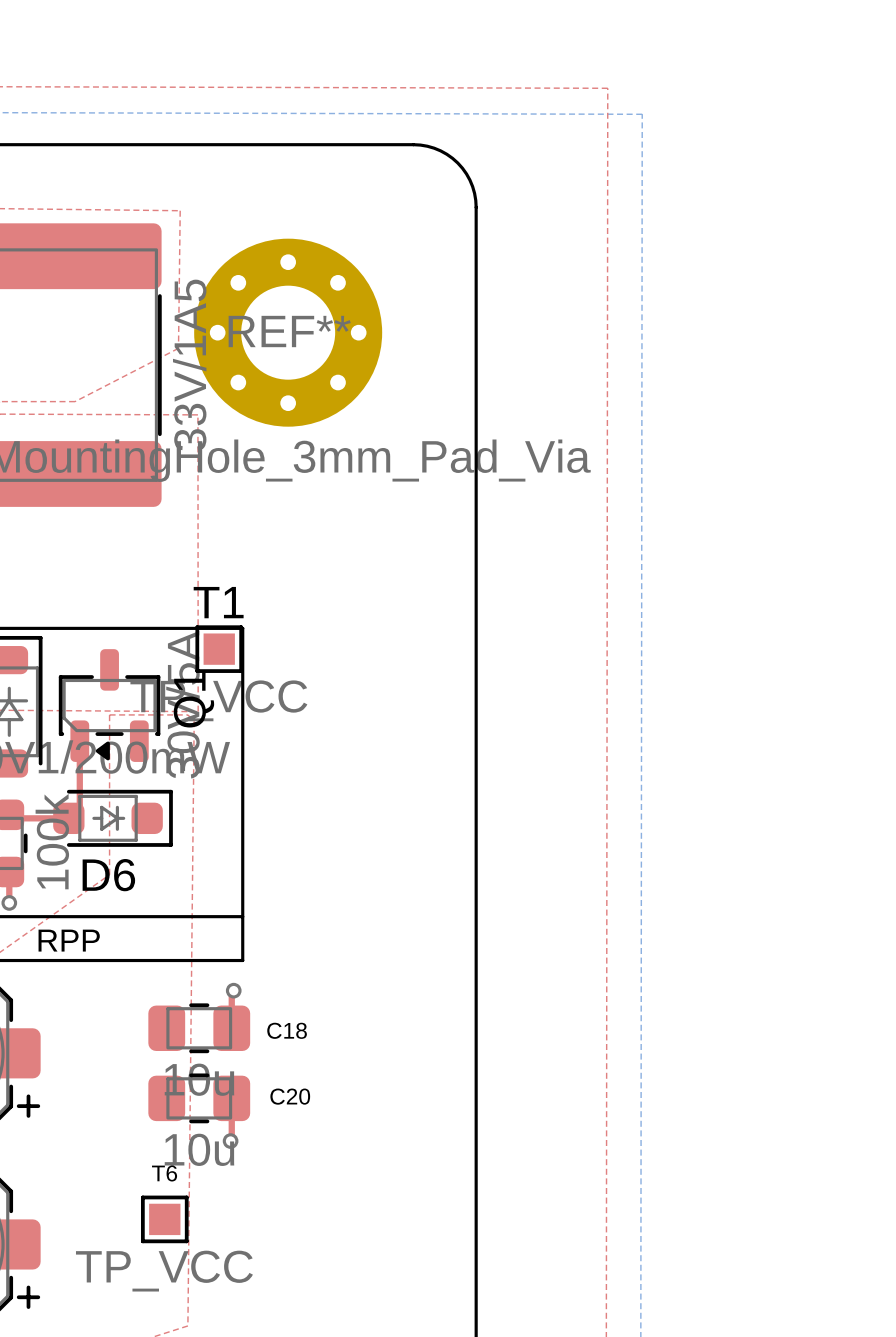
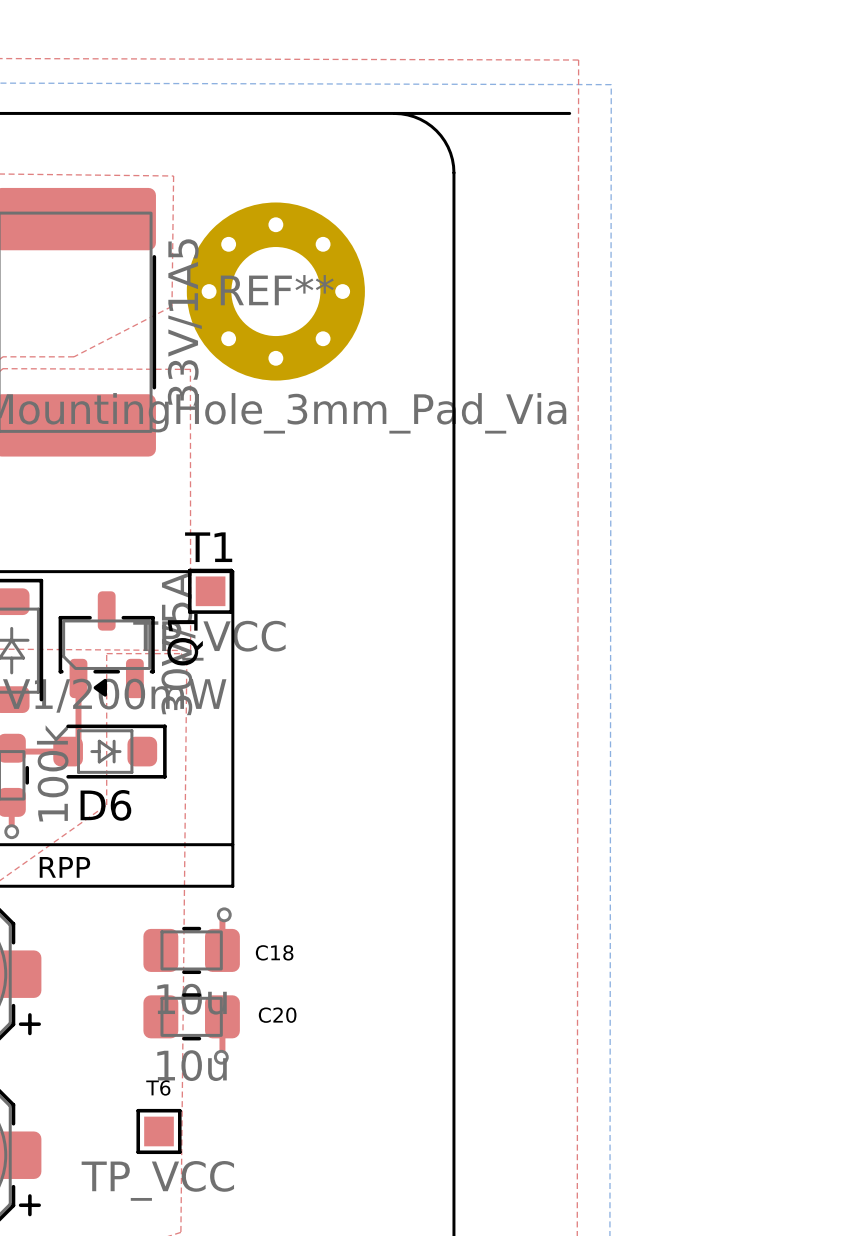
board edge: none -> (394, 113) (569, 113)

